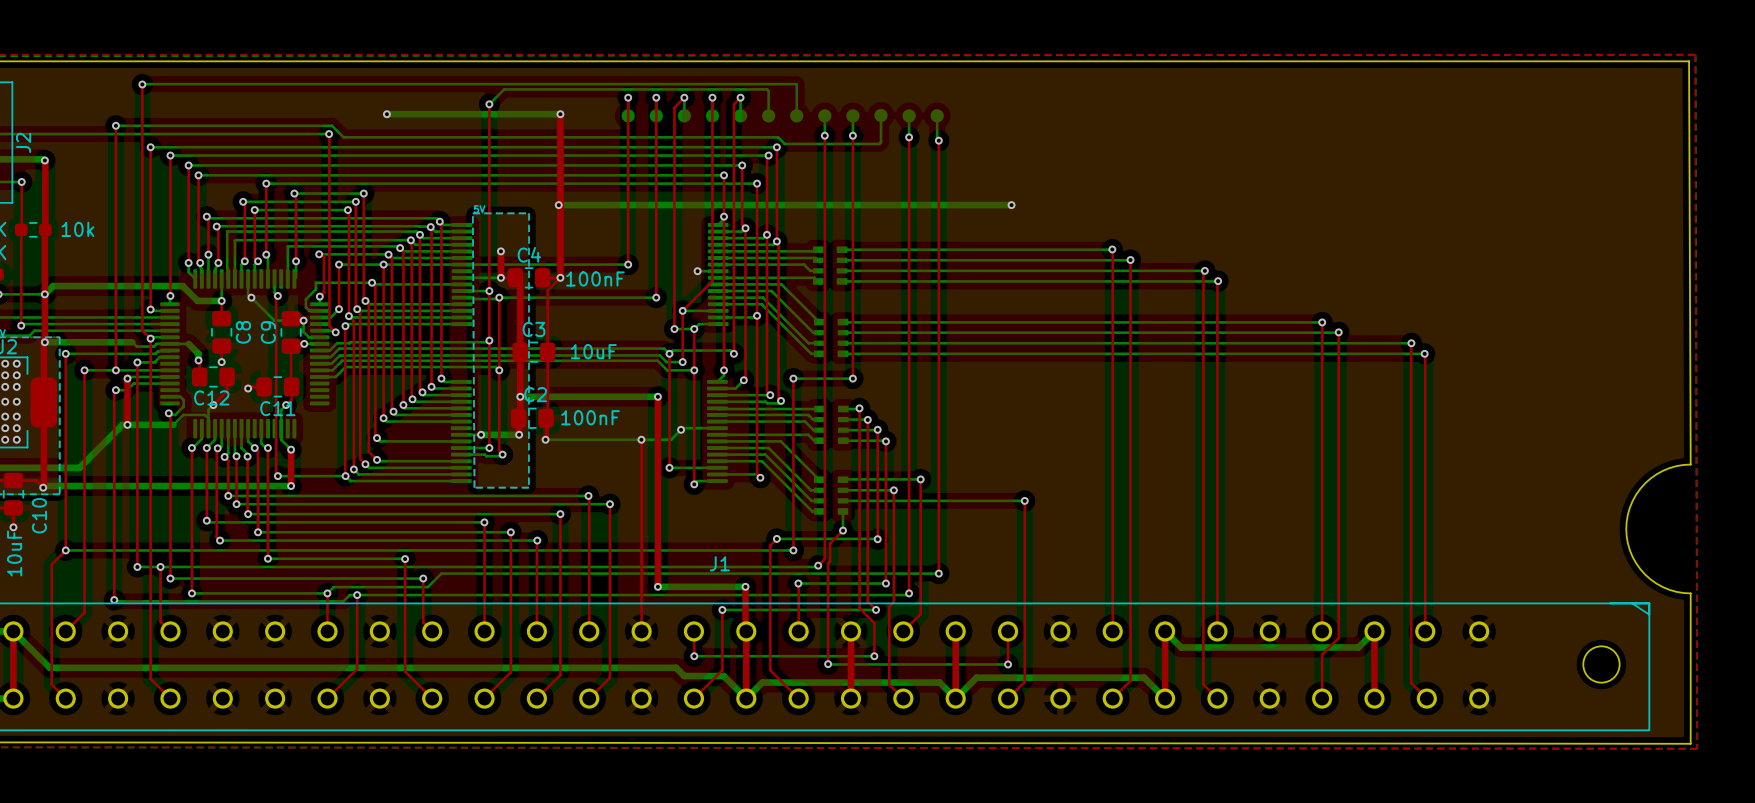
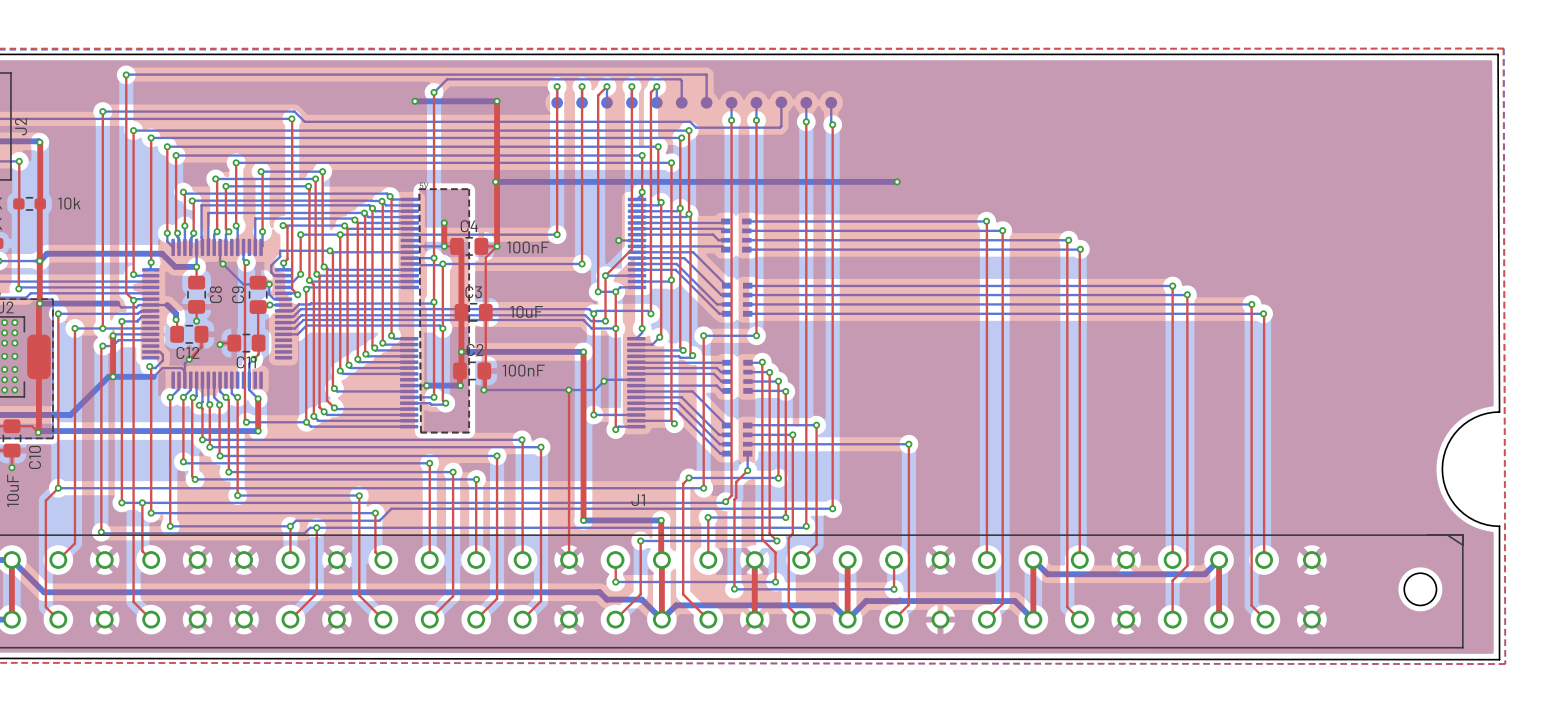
bottom track: (386, 114) (467, 114) -> none
via: (386, 114) -> none
via: none -> (414, 101)

